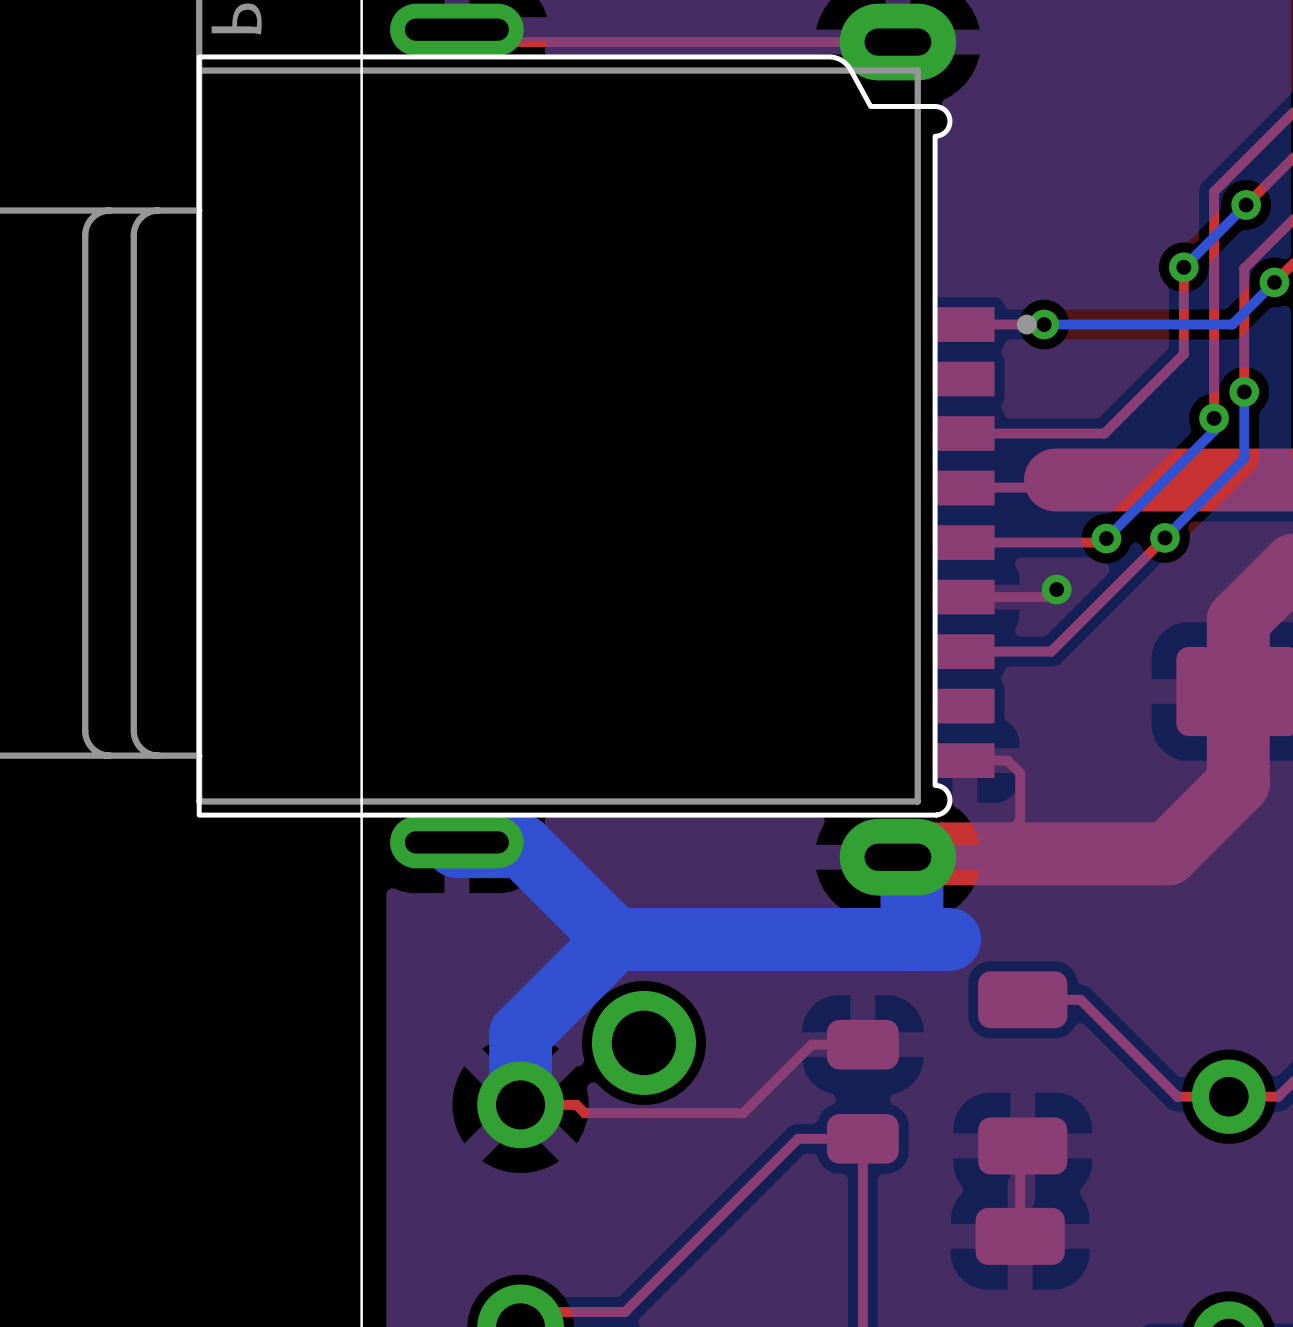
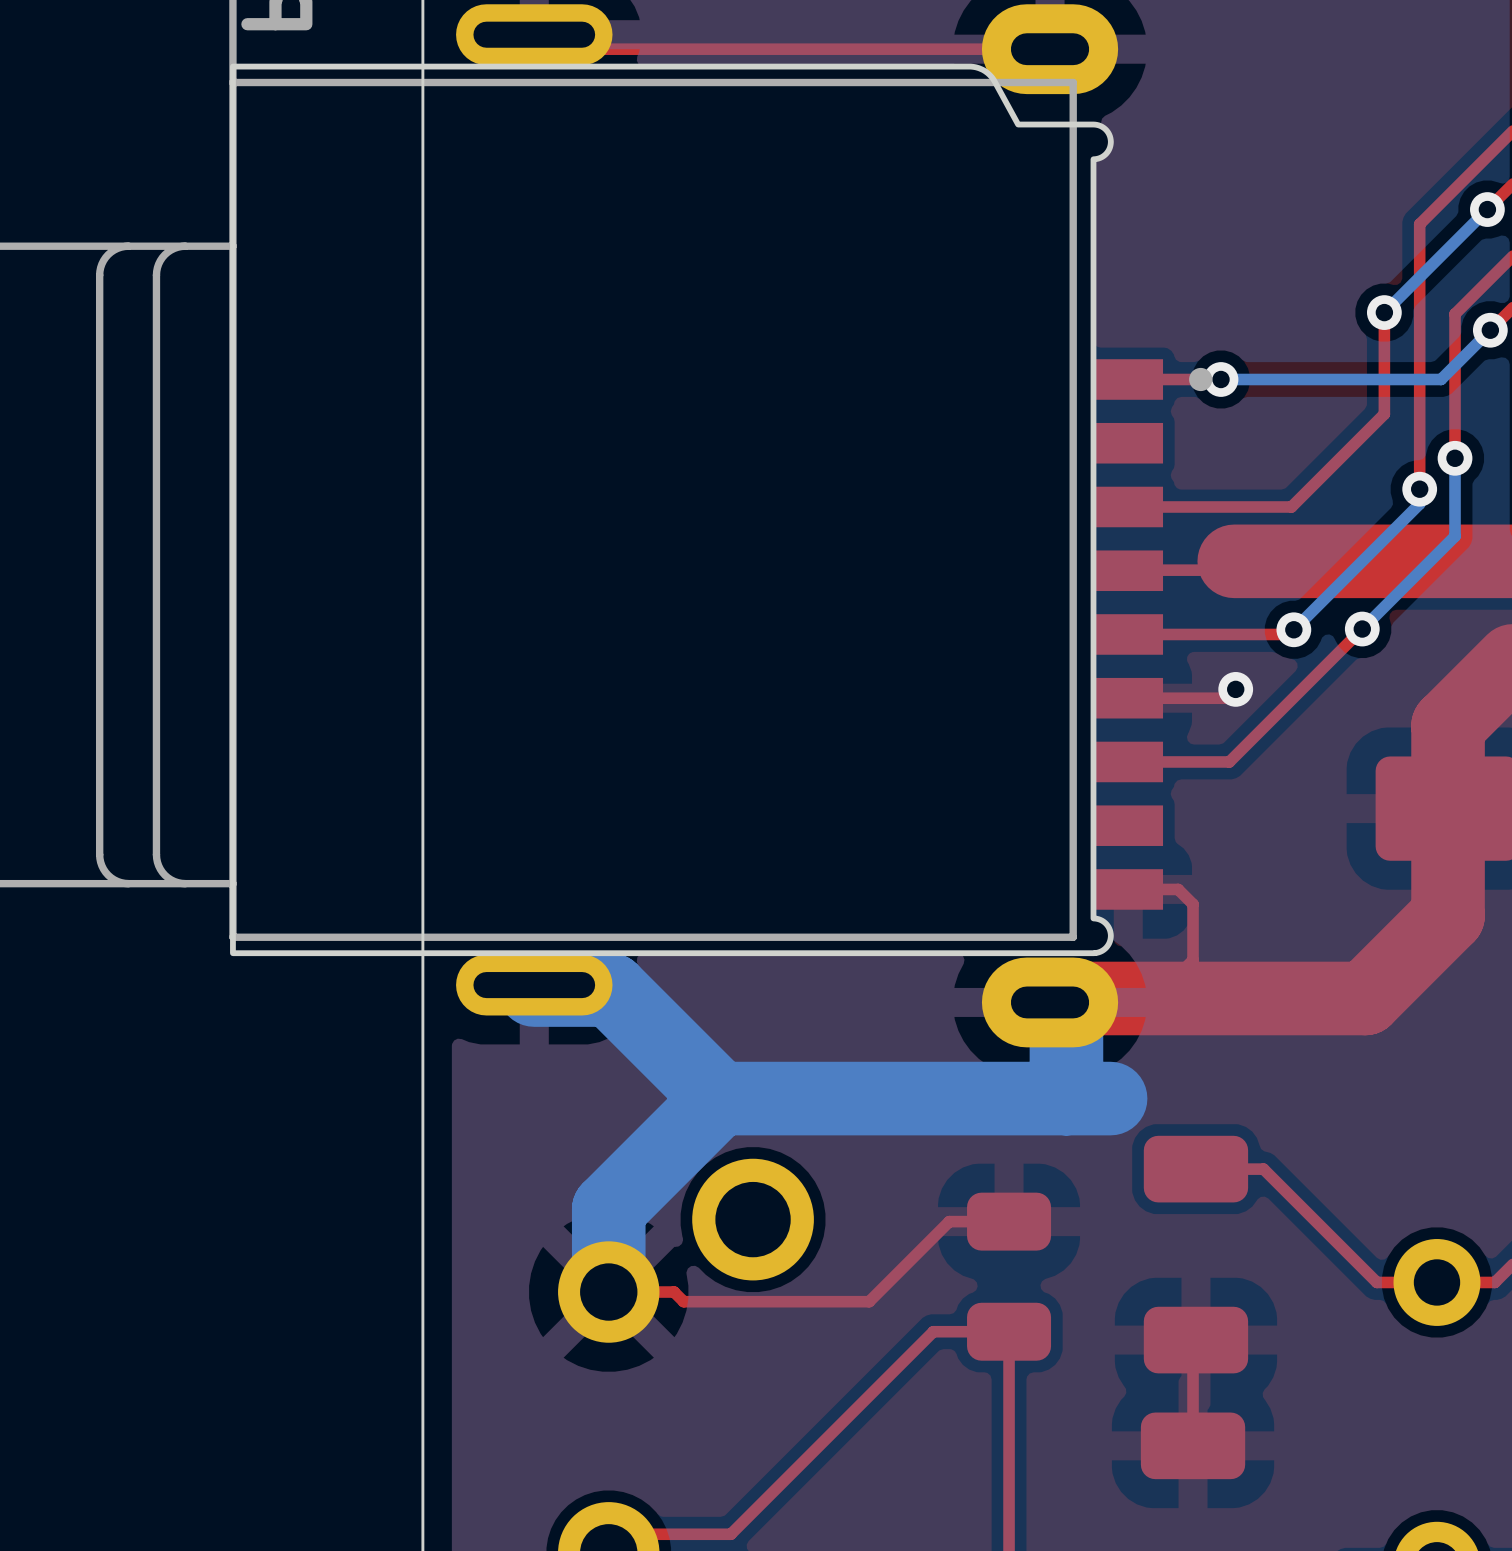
top track: (1271, 179) (1246, 204) -> none
bottom track: none -> (1487, 209) (1457, 239)
via position: (1246, 204) -> (1487, 209)

